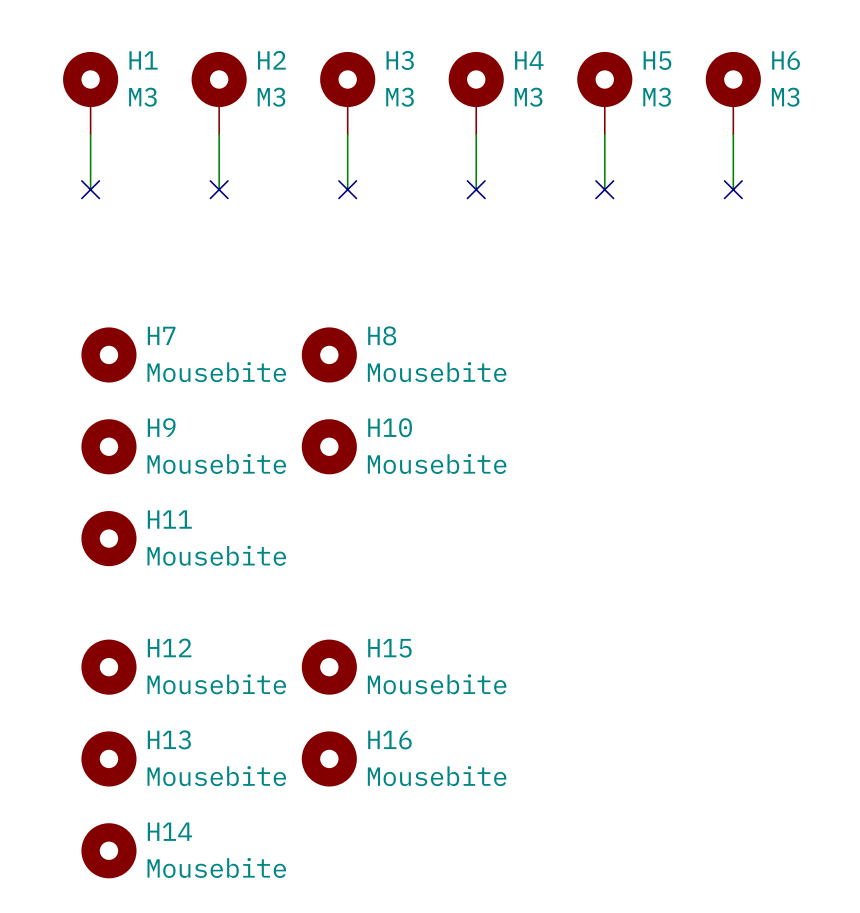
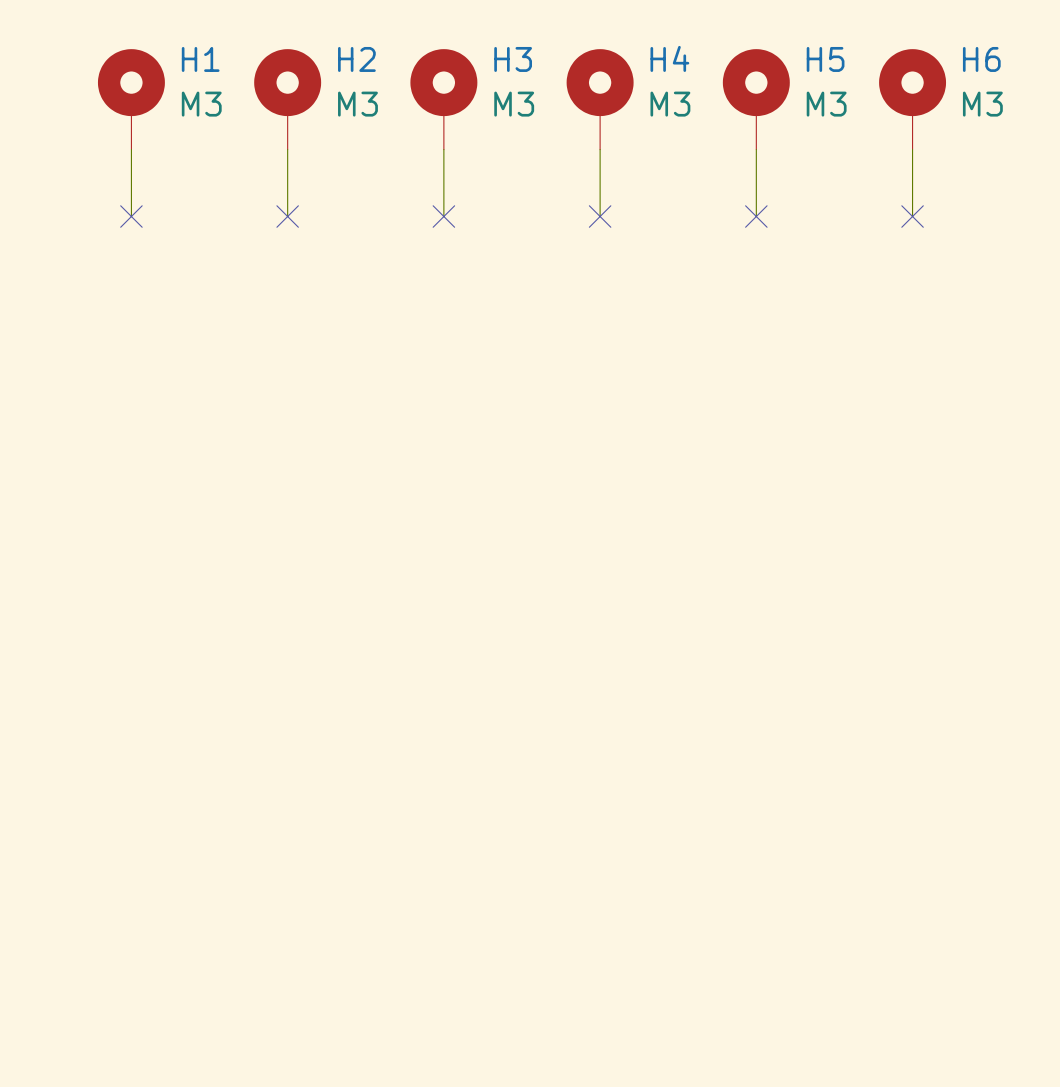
H7: Mousebite (108, 354) -> none
H8: Mousebite (329, 354) -> none
H9: Mousebite (108, 446) -> none
H10: Mousebite (329, 446) -> none
H11: Mousebite (108, 538) -> none
H12: Mousebite (108, 667) -> none
H15: Mousebite (329, 667) -> none
H13: Mousebite (108, 758) -> none
H16: Mousebite (329, 758) -> none
H14: Mousebite (108, 850) -> none

